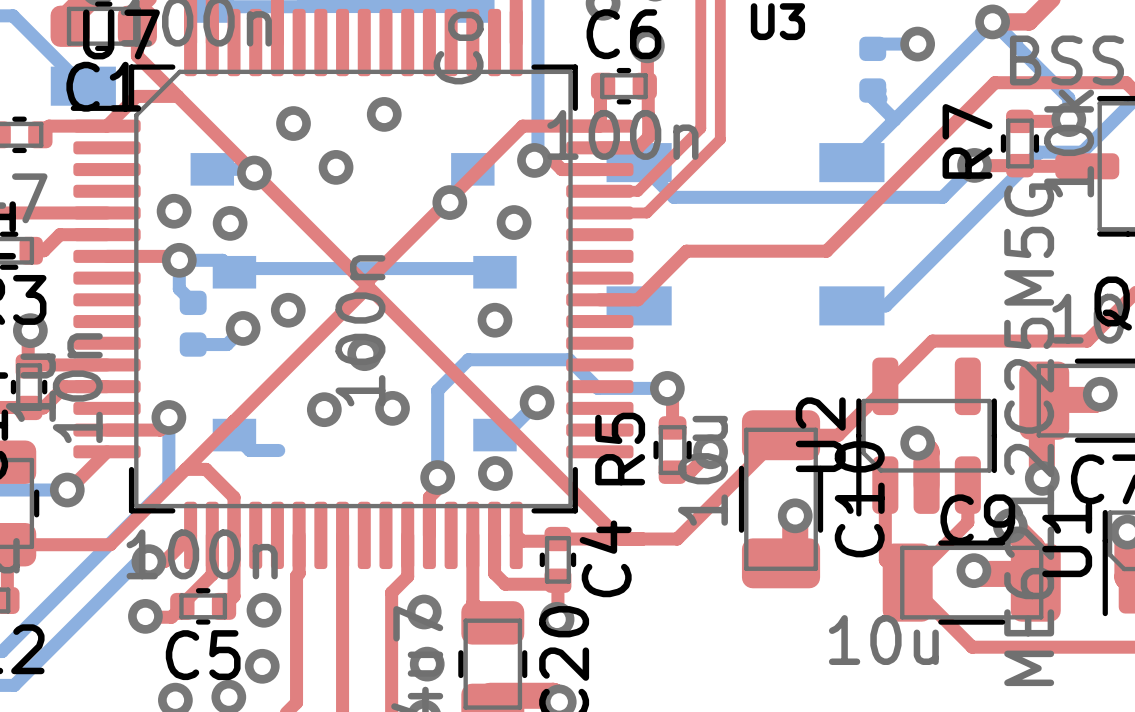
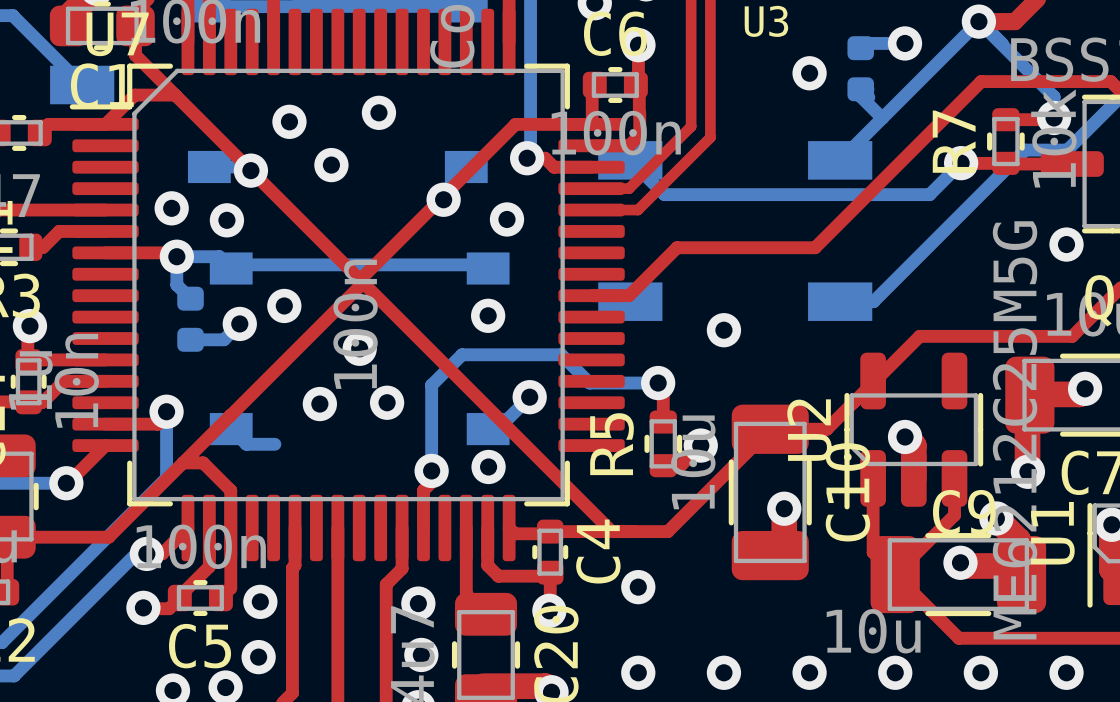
via: none -> (809, 73)
via: none -> (1066, 244)
via: none -> (723, 330)
via: none -> (638, 587)
via: none -> (638, 672)
via: none -> (723, 672)
via: none -> (809, 672)
via: none -> (895, 672)
via: none -> (980, 672)
via: none -> (1066, 672)

